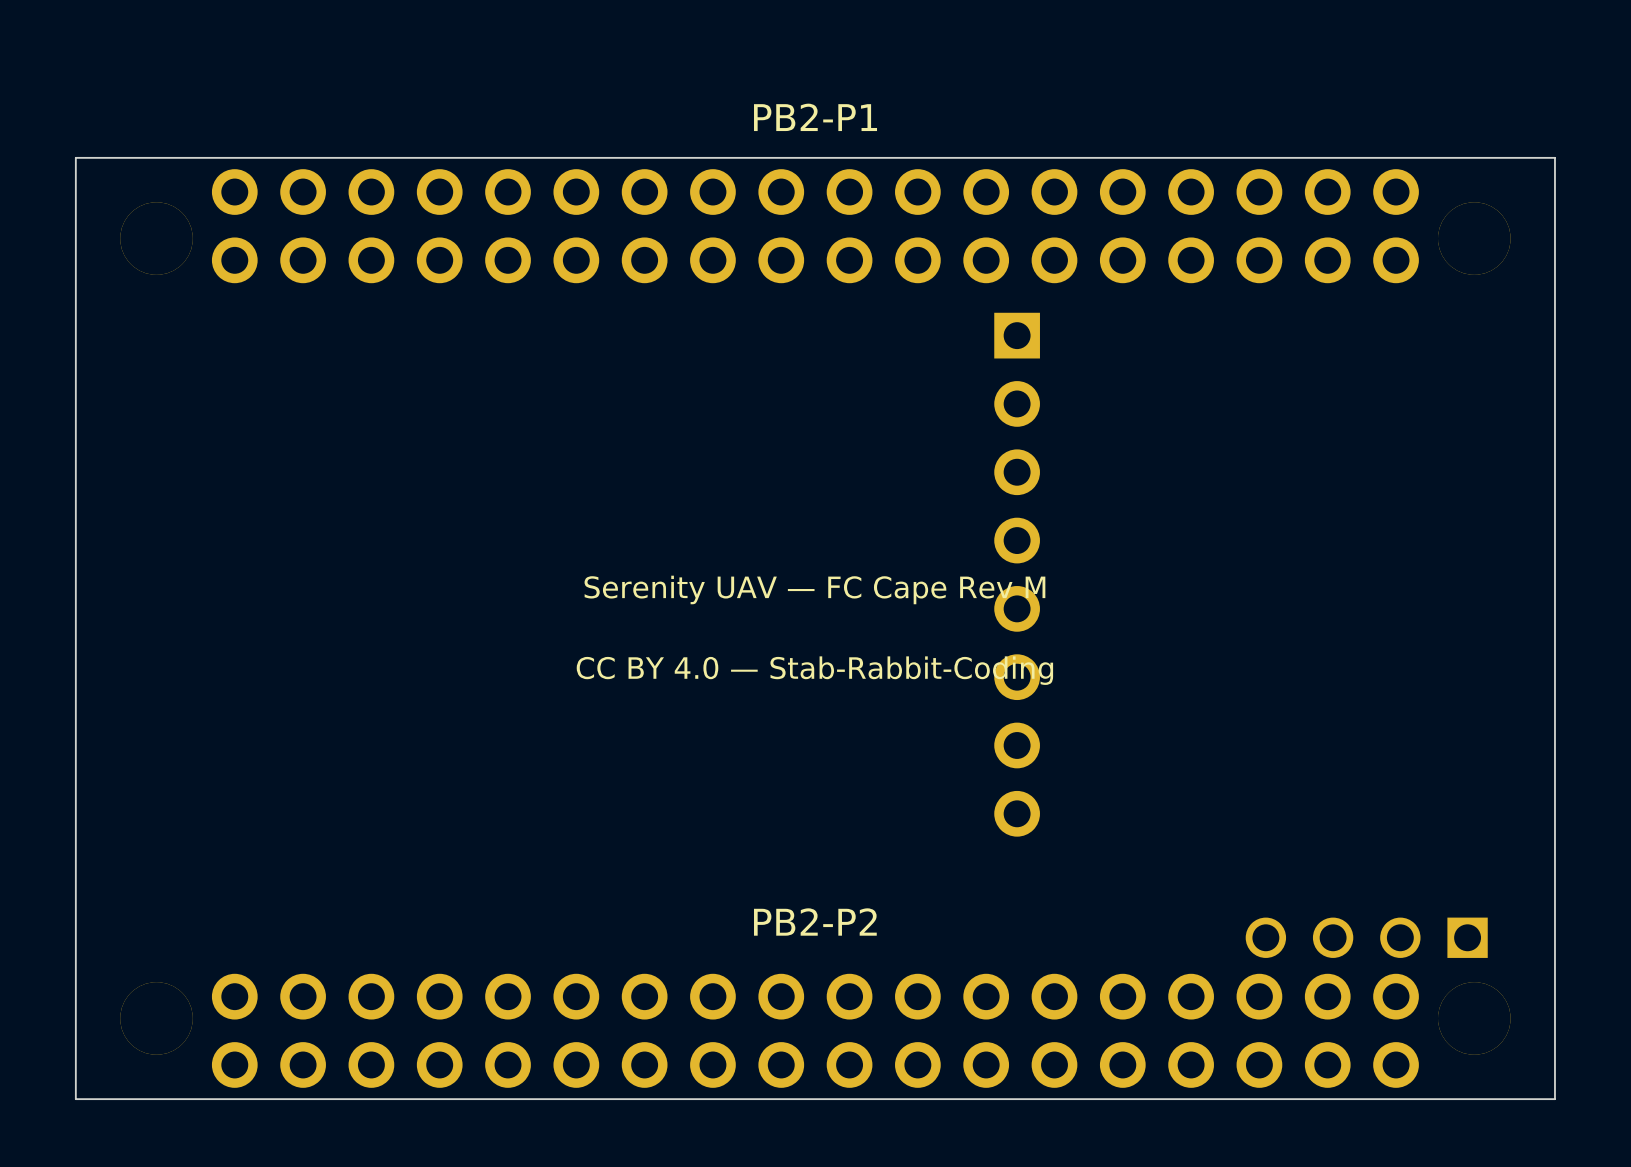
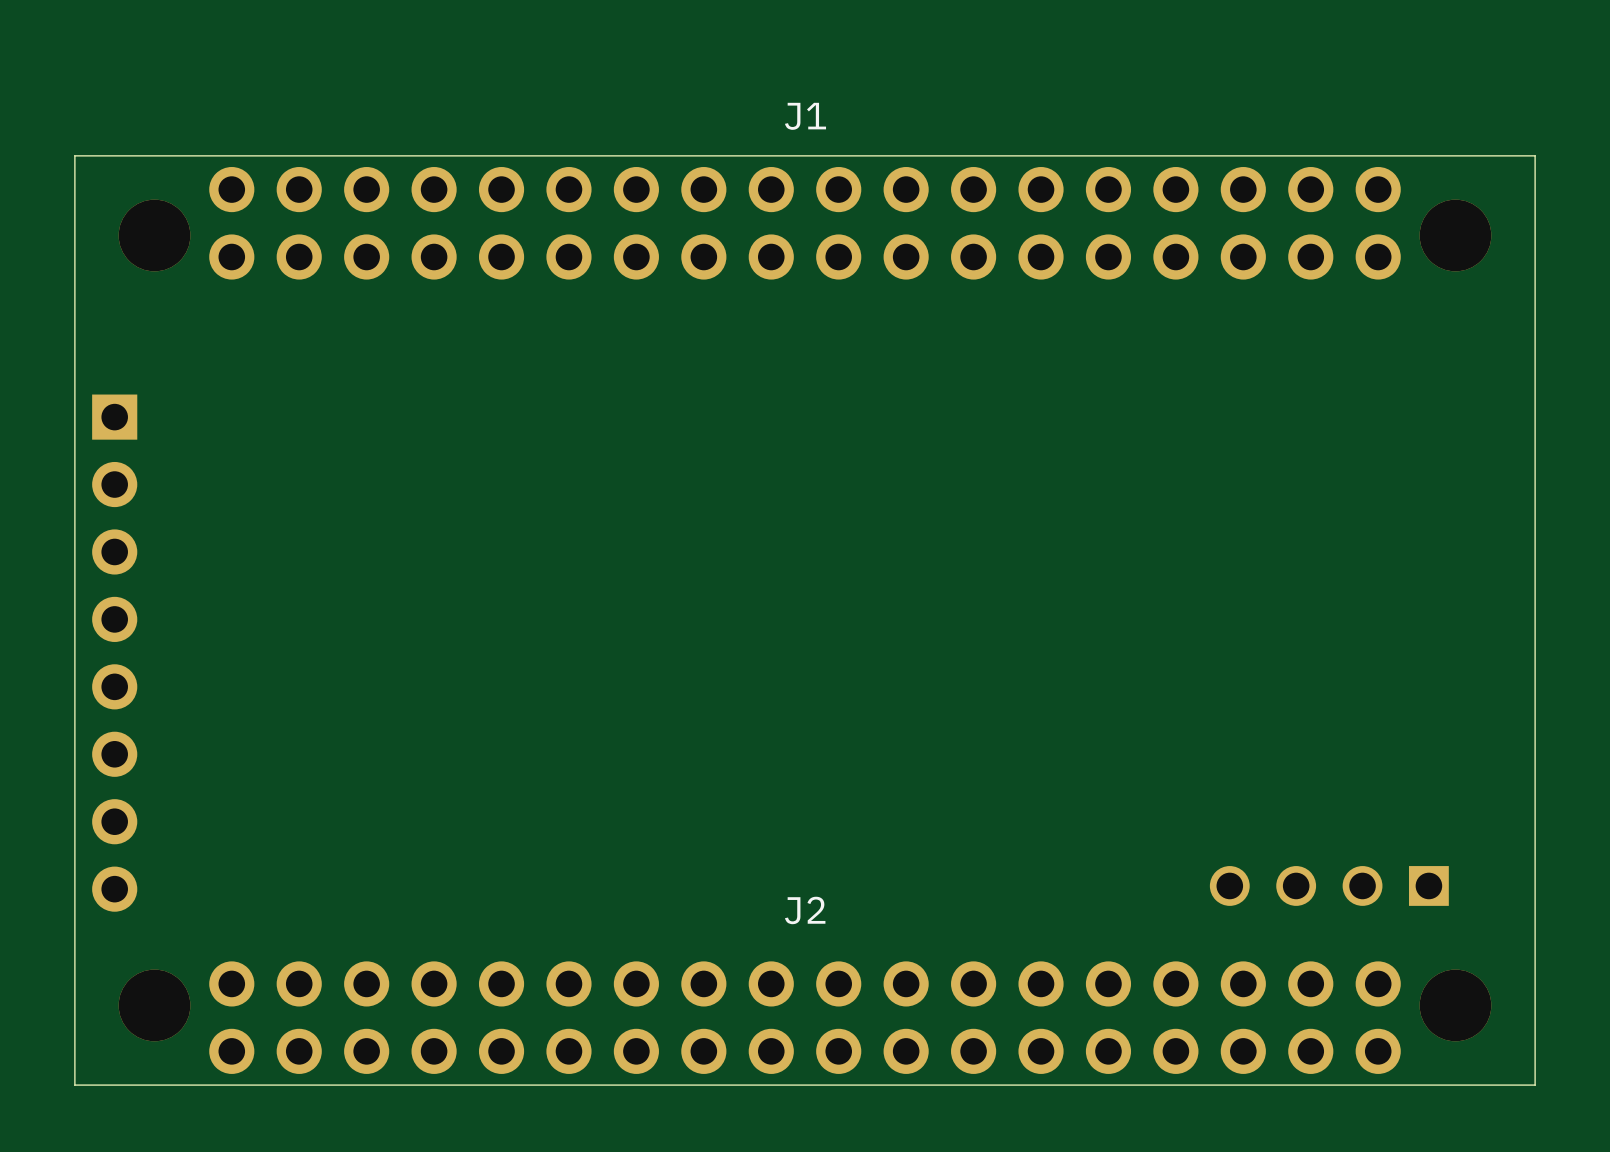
PB2-P1 name: PB2-P1 (815, 117) -> J1 (805, 116)
part: (1017, 574) -> none
text: Serenity UAV — FC Cape Rev M (814, 589) -> none
part: none -> (114, 653)
text: CC BY 4.0 — Stab-Rabbit-Coding (814, 670) -> none
PB2-P2 name: PB2-P2 (815, 922) -> J2 (805, 910)
part position: (1366, 937) -> (1329, 885)

